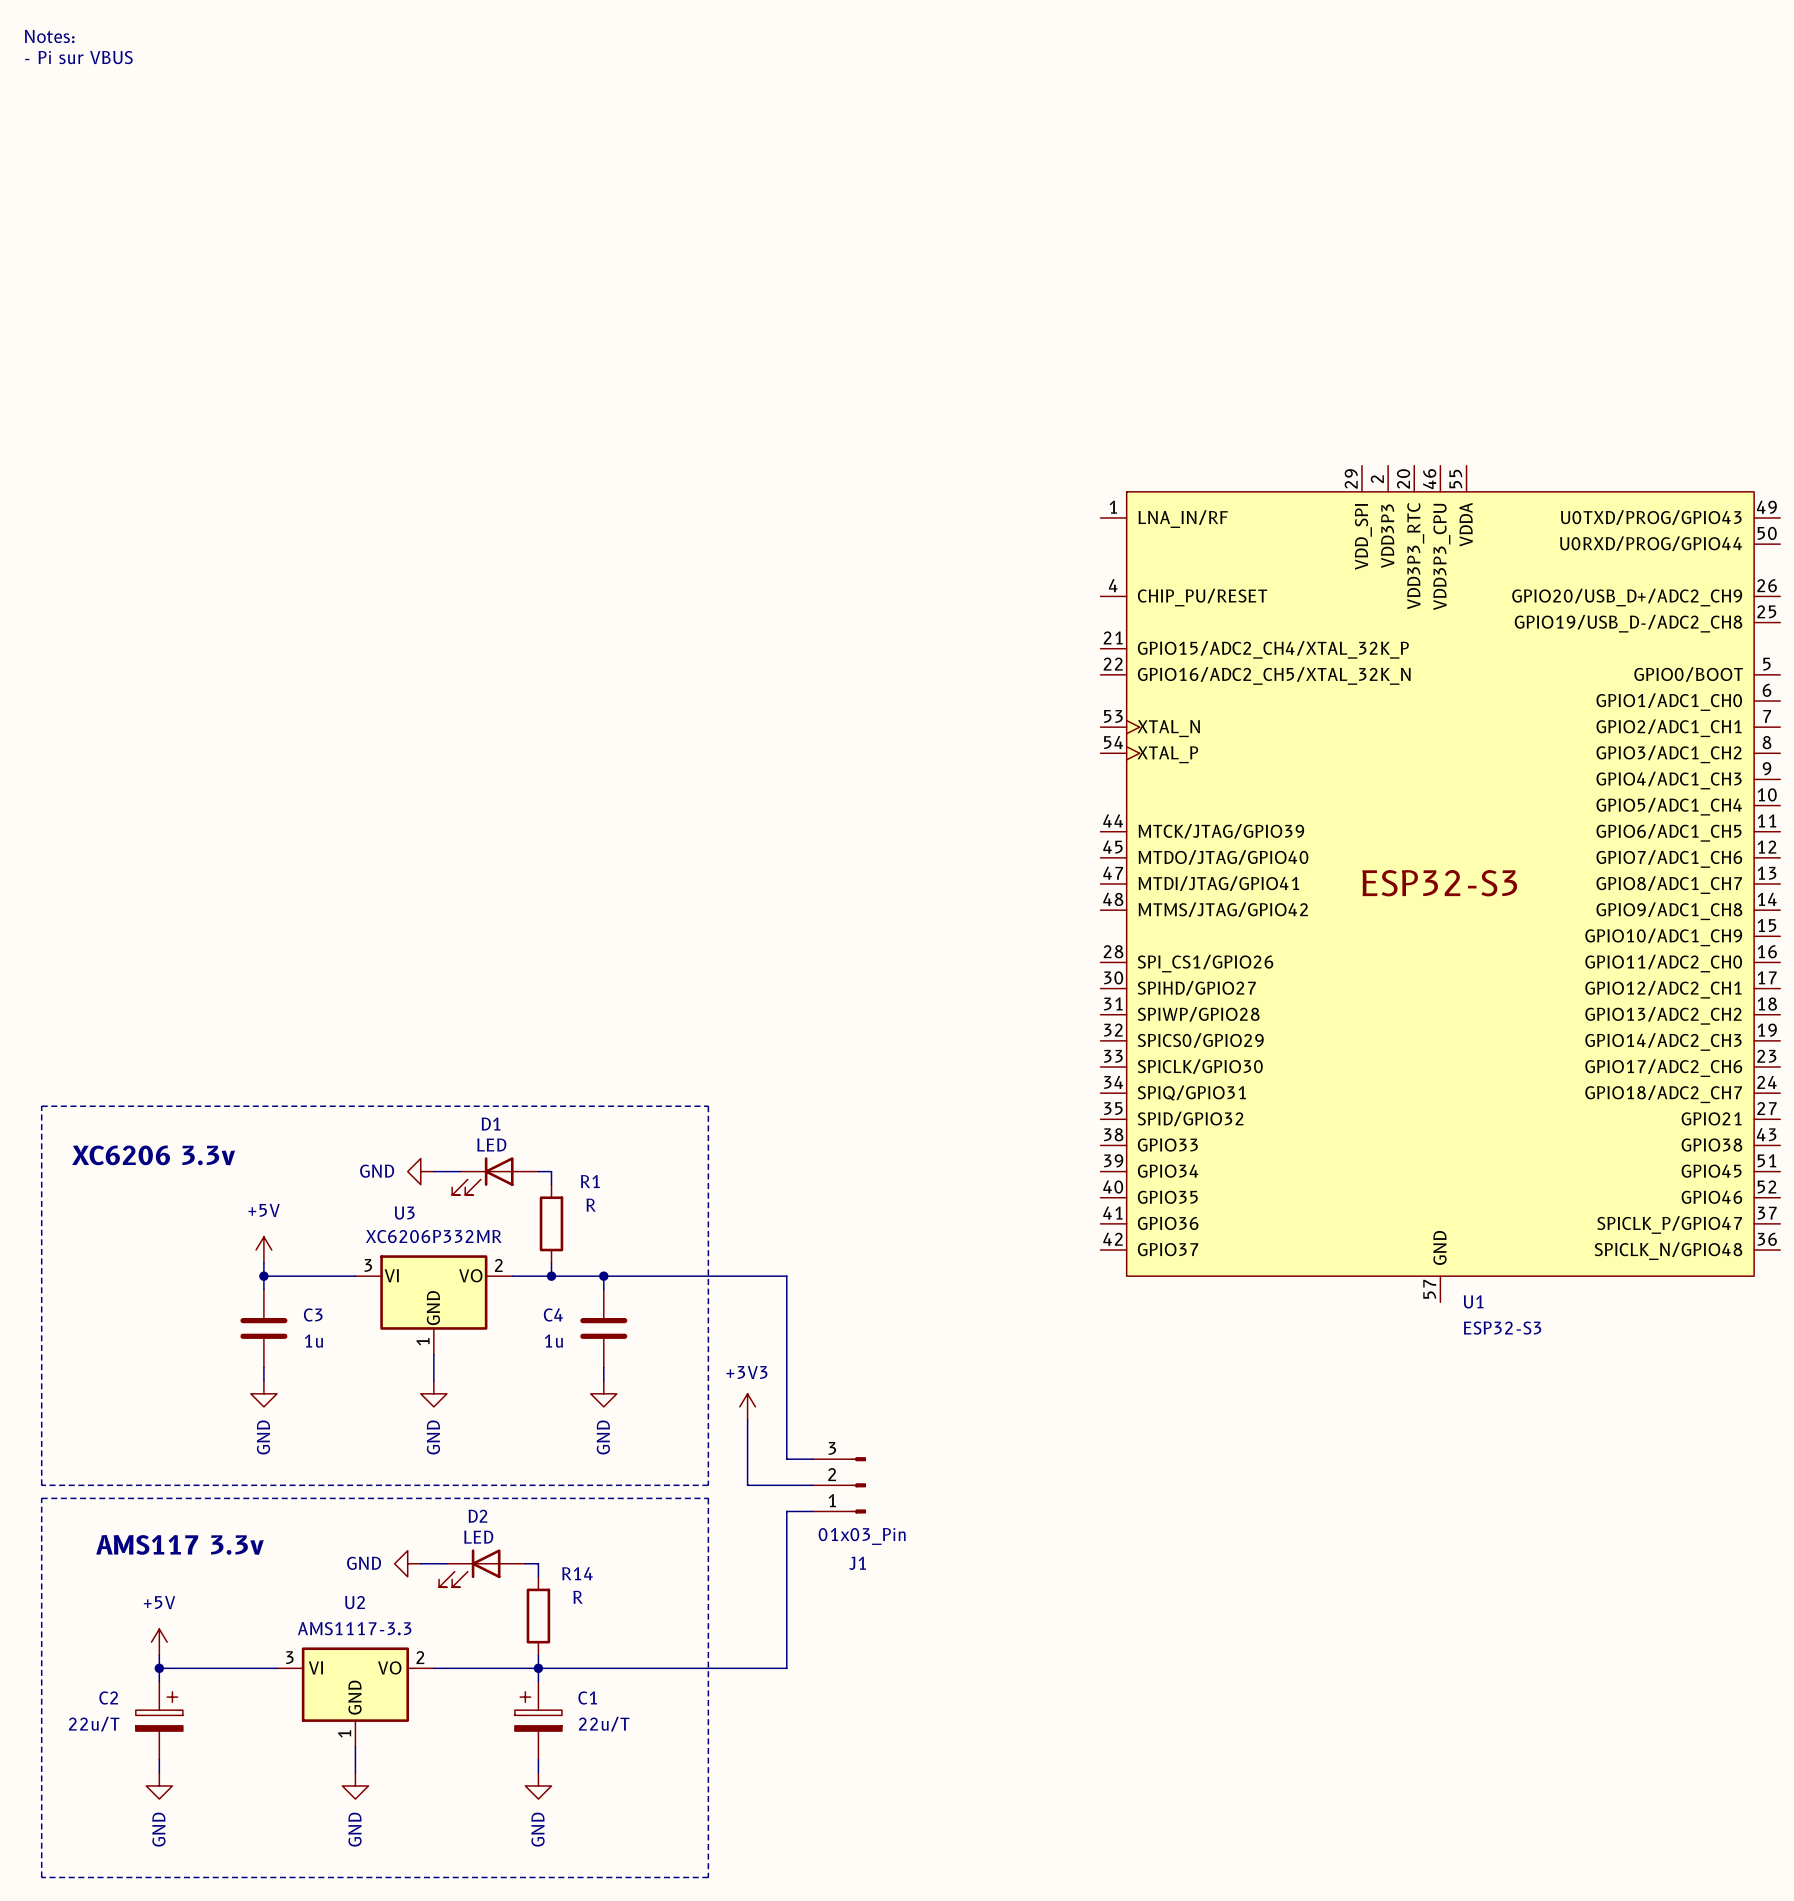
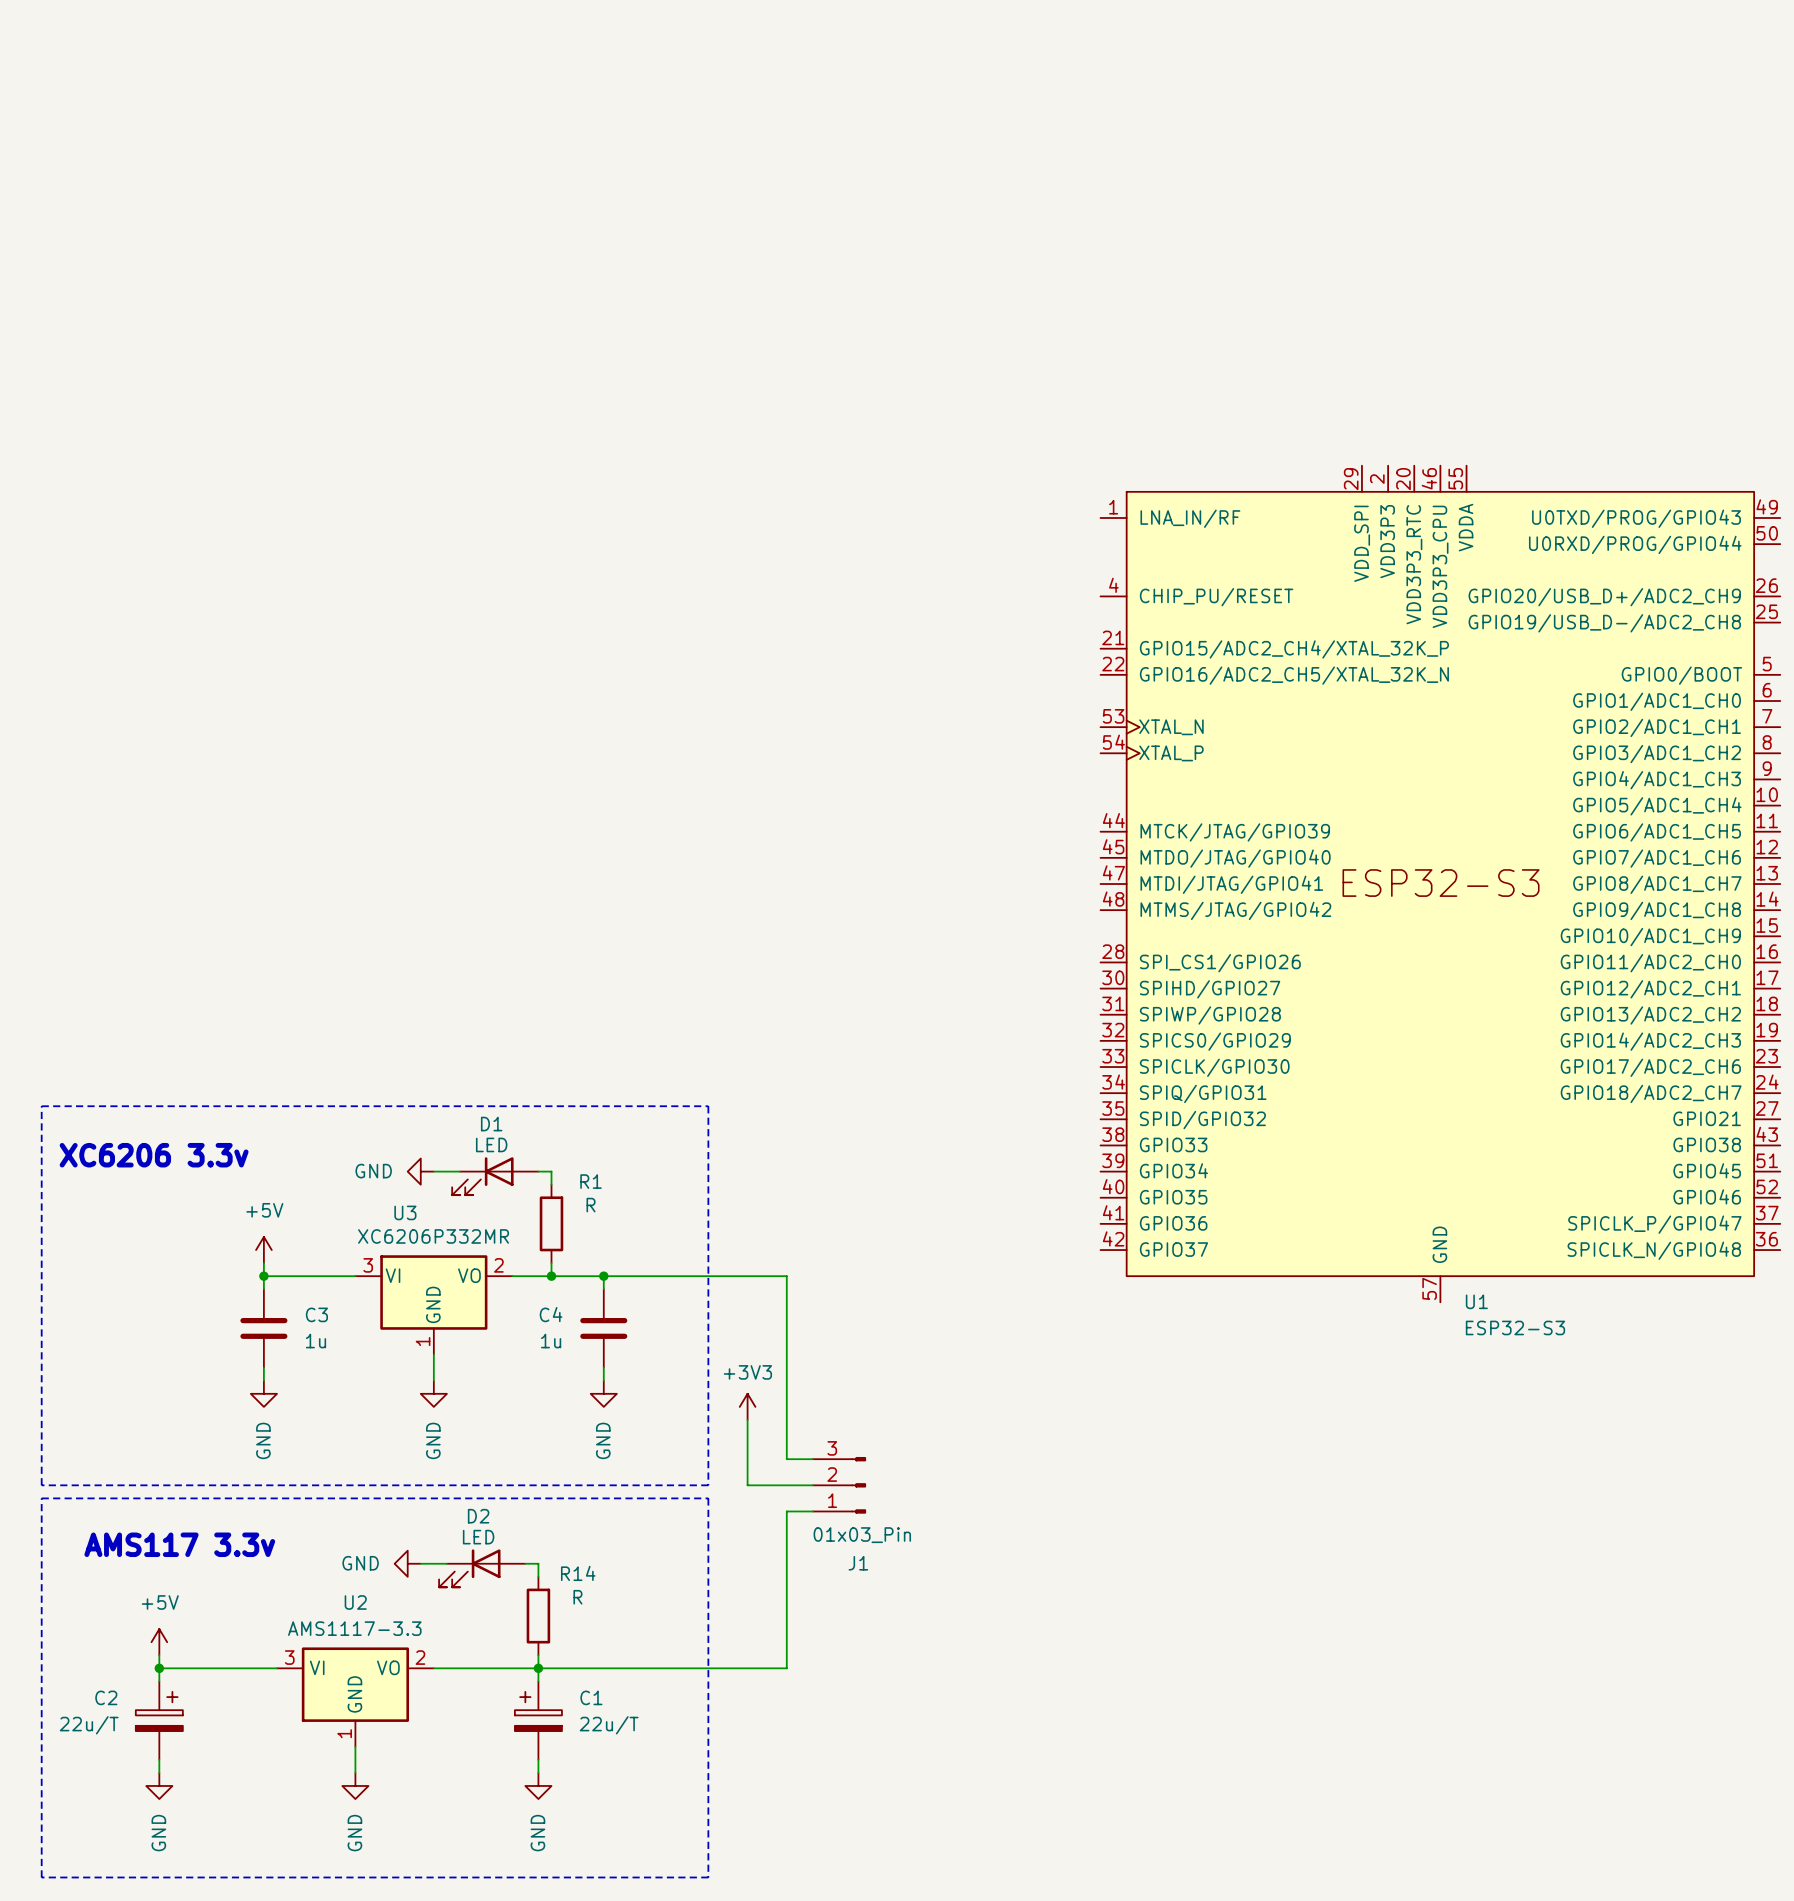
text: Notes: (49, 36) -> none
text: - Pi sur VBUS (78, 57) -> none

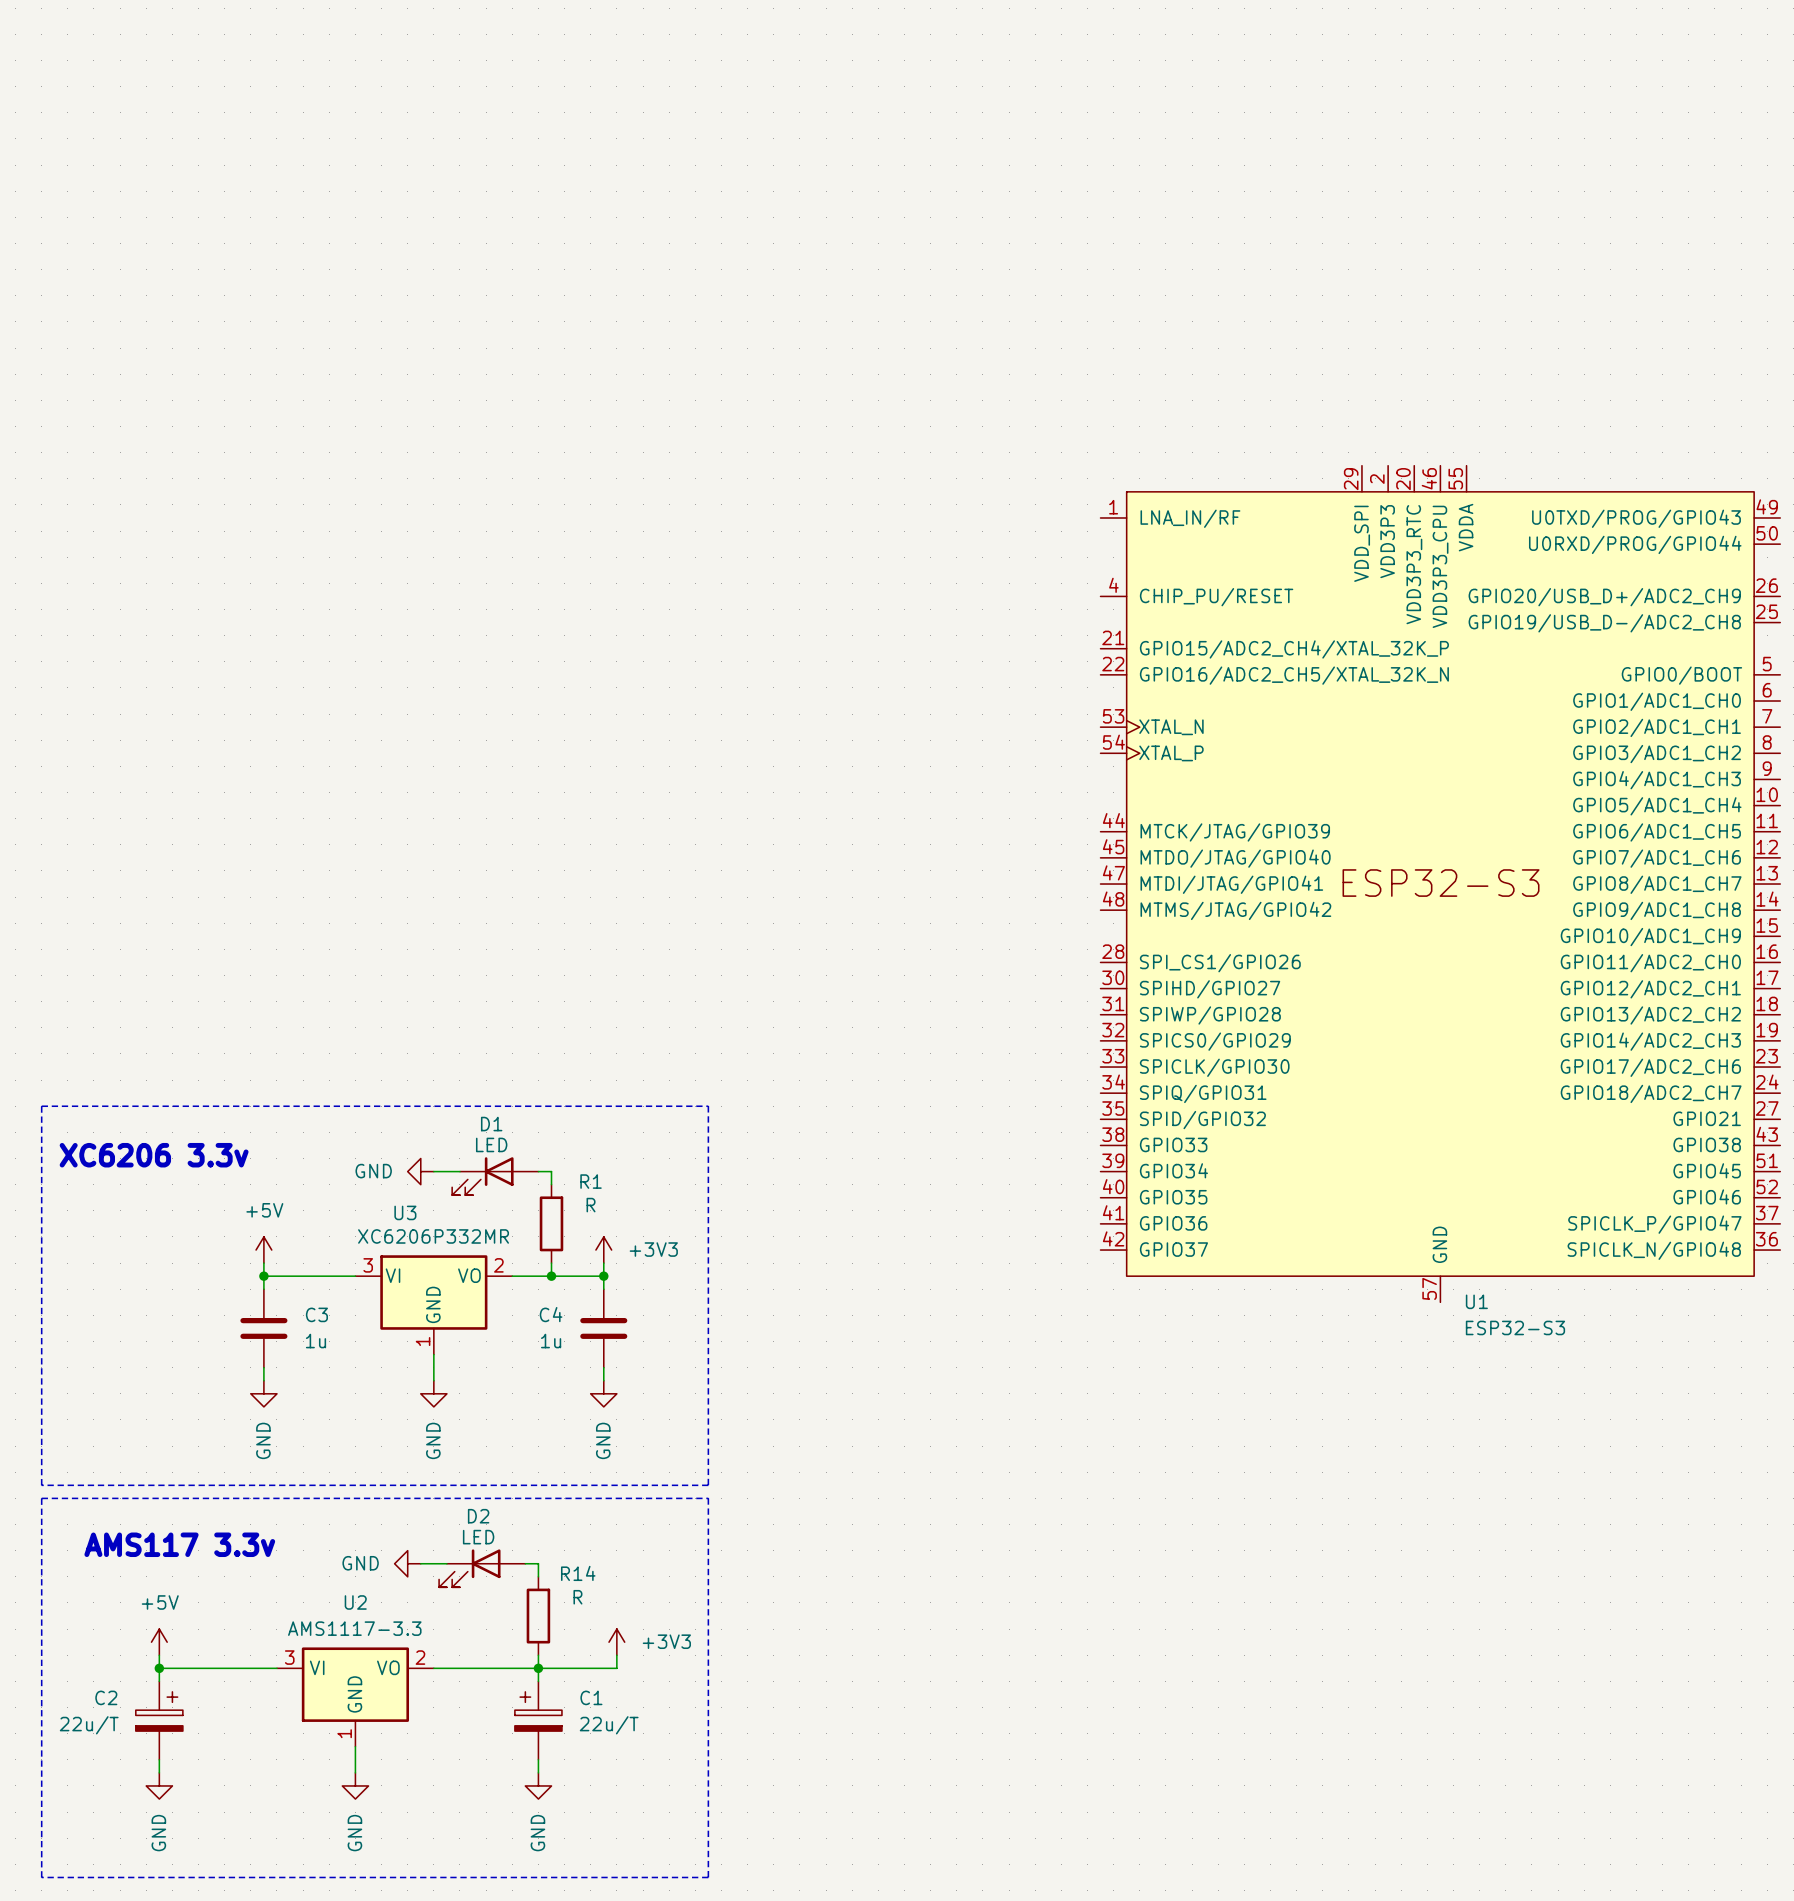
power symbol: none -> +3V3 (603, 1250)
wire: (603, 1276) (786, 1276) (786, 1459) (812, 1459) -> (603, 1276) (603, 1263)
power symbol: +3V3 (747, 1406) -> none
wire: (747, 1419) (747, 1485) (812, 1485) -> none
J1: 01x03_Pin (839, 1485) -> none
wire: (812, 1511) (786, 1511) (786, 1668) (616, 1668) -> (616, 1655) (616, 1668)
power symbol: none -> +3V3 (616, 1642)

